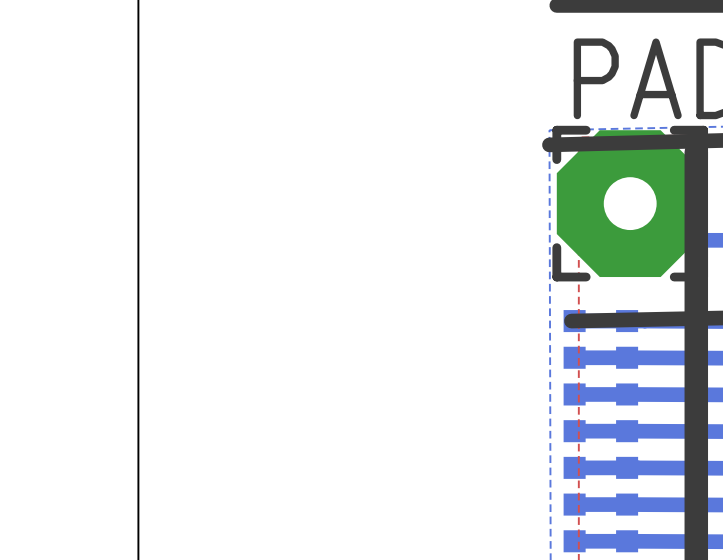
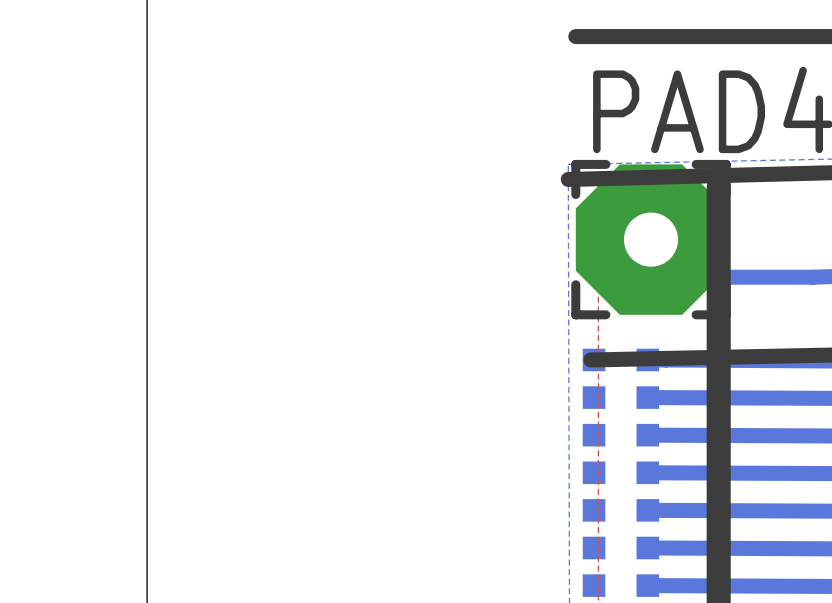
bottom track: (574, 357) (627, 357) -> none
bottom track: (574, 394) (627, 394) -> none
bottom track: (574, 431) (627, 431) -> none
bottom track: (574, 467) (627, 467) -> none
bottom track: (574, 504) (627, 504) -> none
bottom track: (574, 541) (627, 541) -> none

